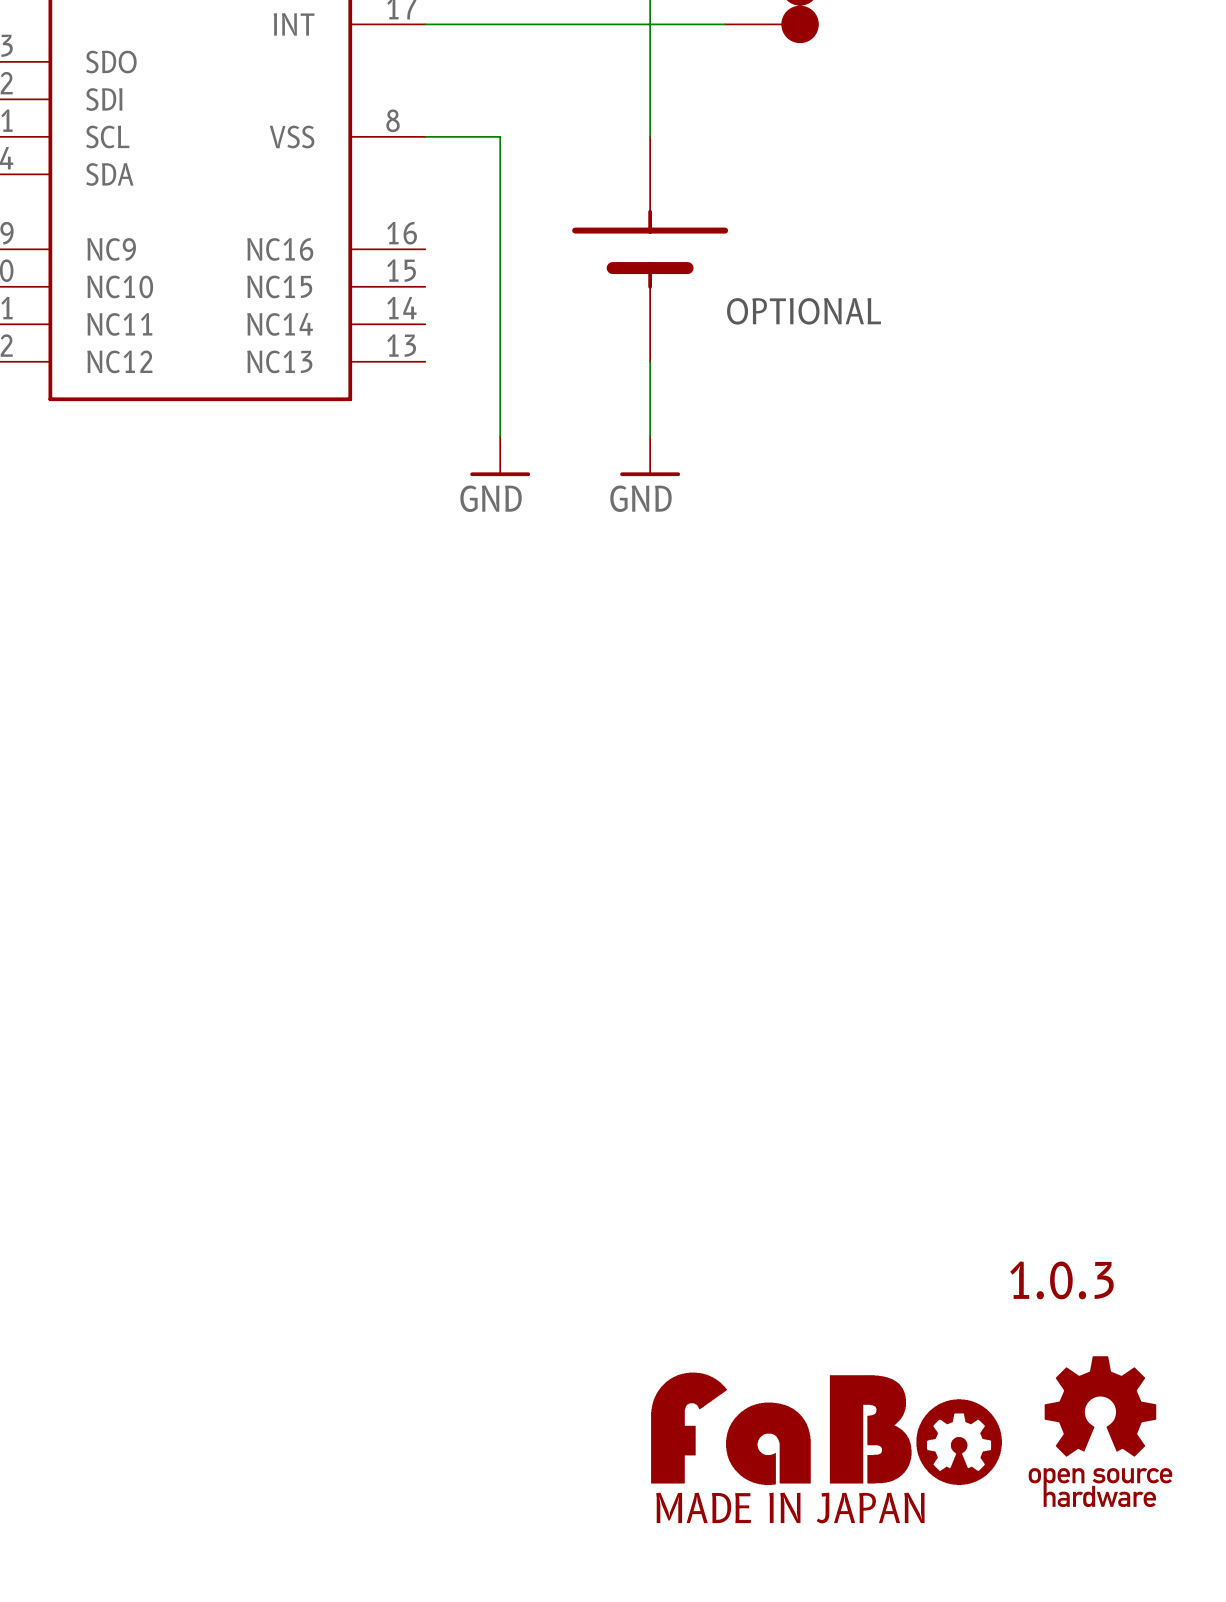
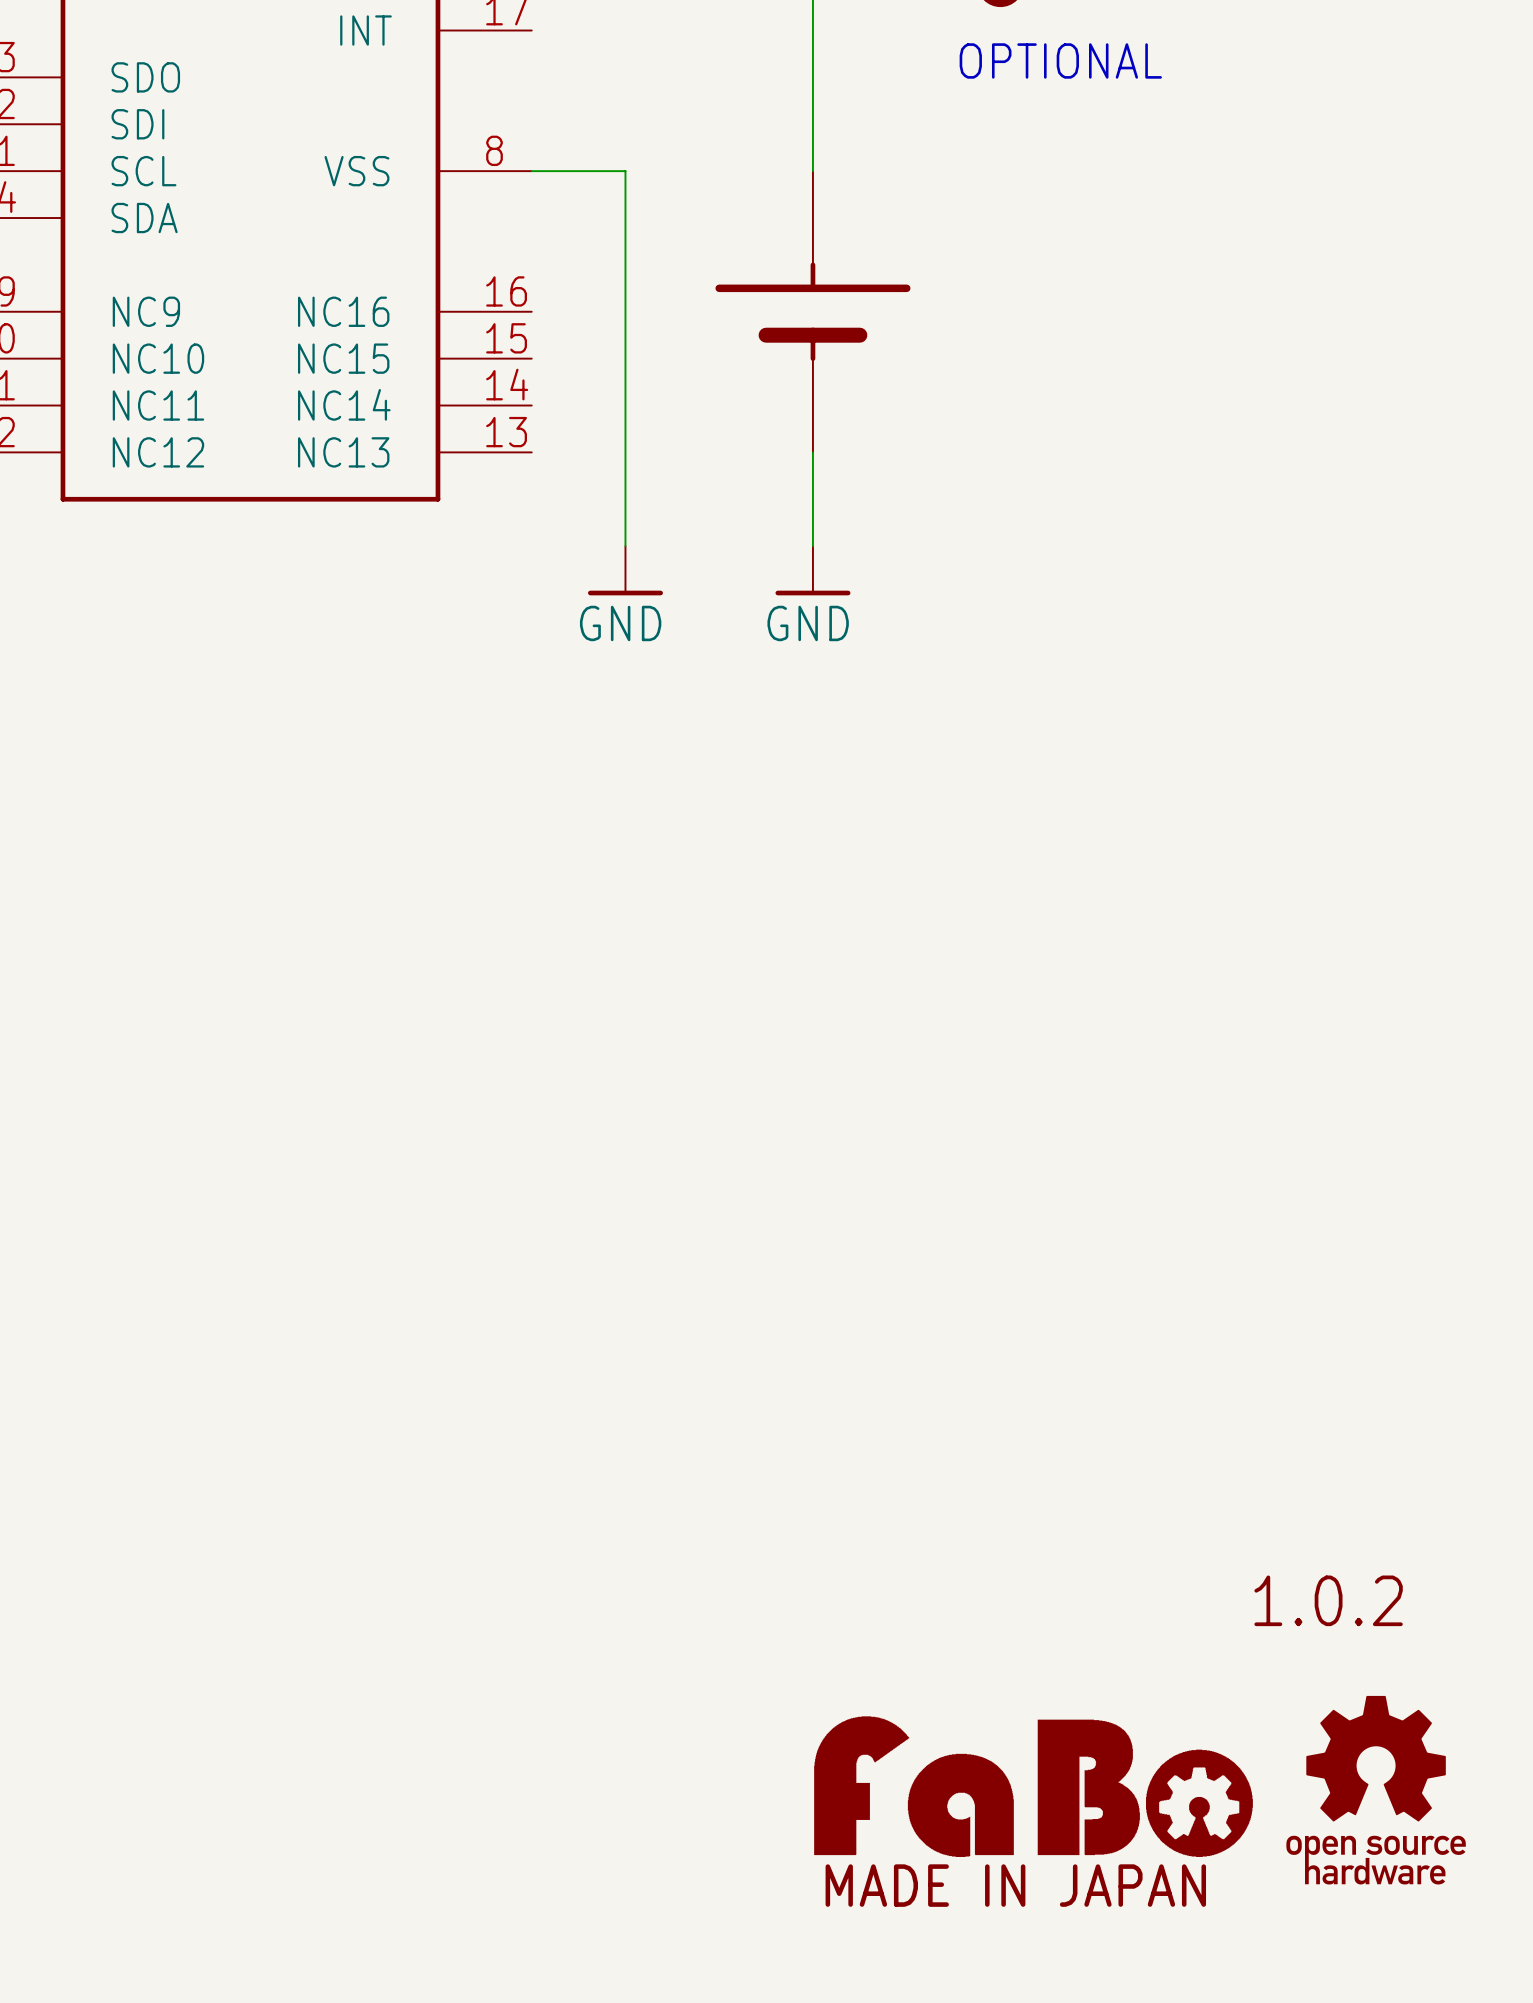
wire: (425, 24) (725, 24) -> none
part: (771, 24) -> none
text position: OPTIONAL (804, 311) -> OPTIONAL (1060, 60)
text: 1.0.3 (1061, 1280) -> 1.0.2 (1328, 1600)

